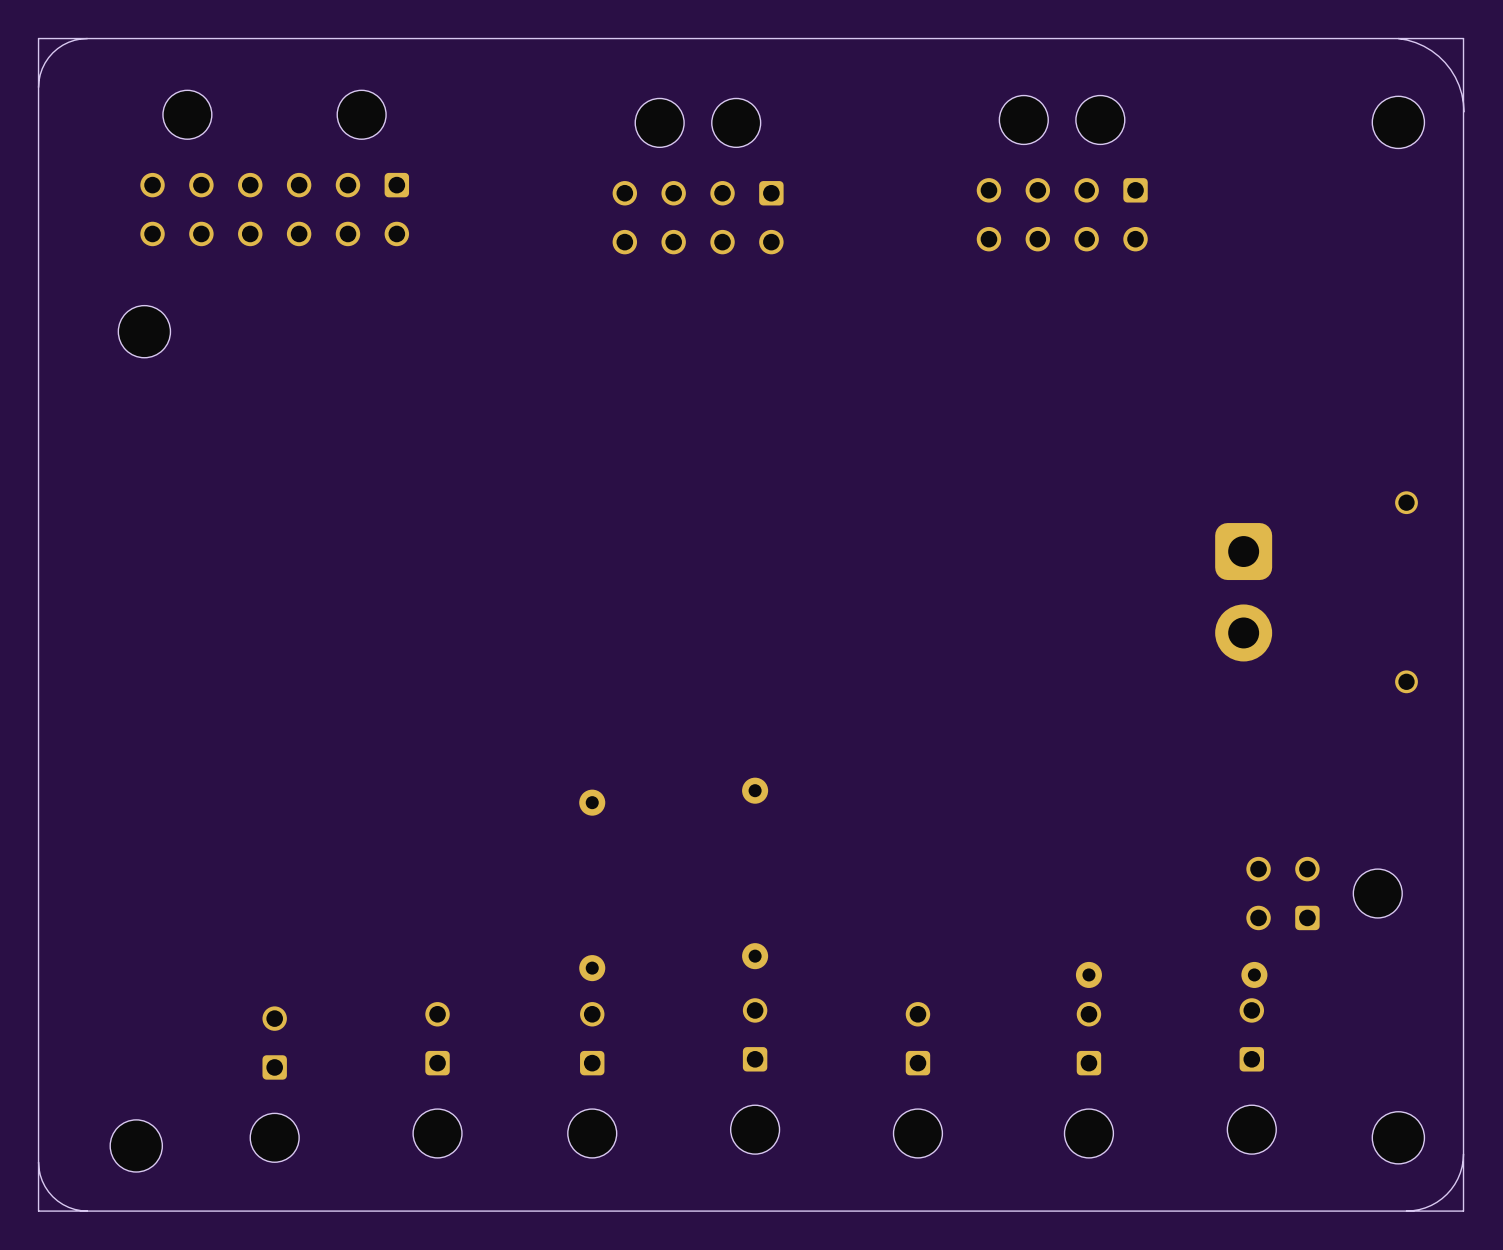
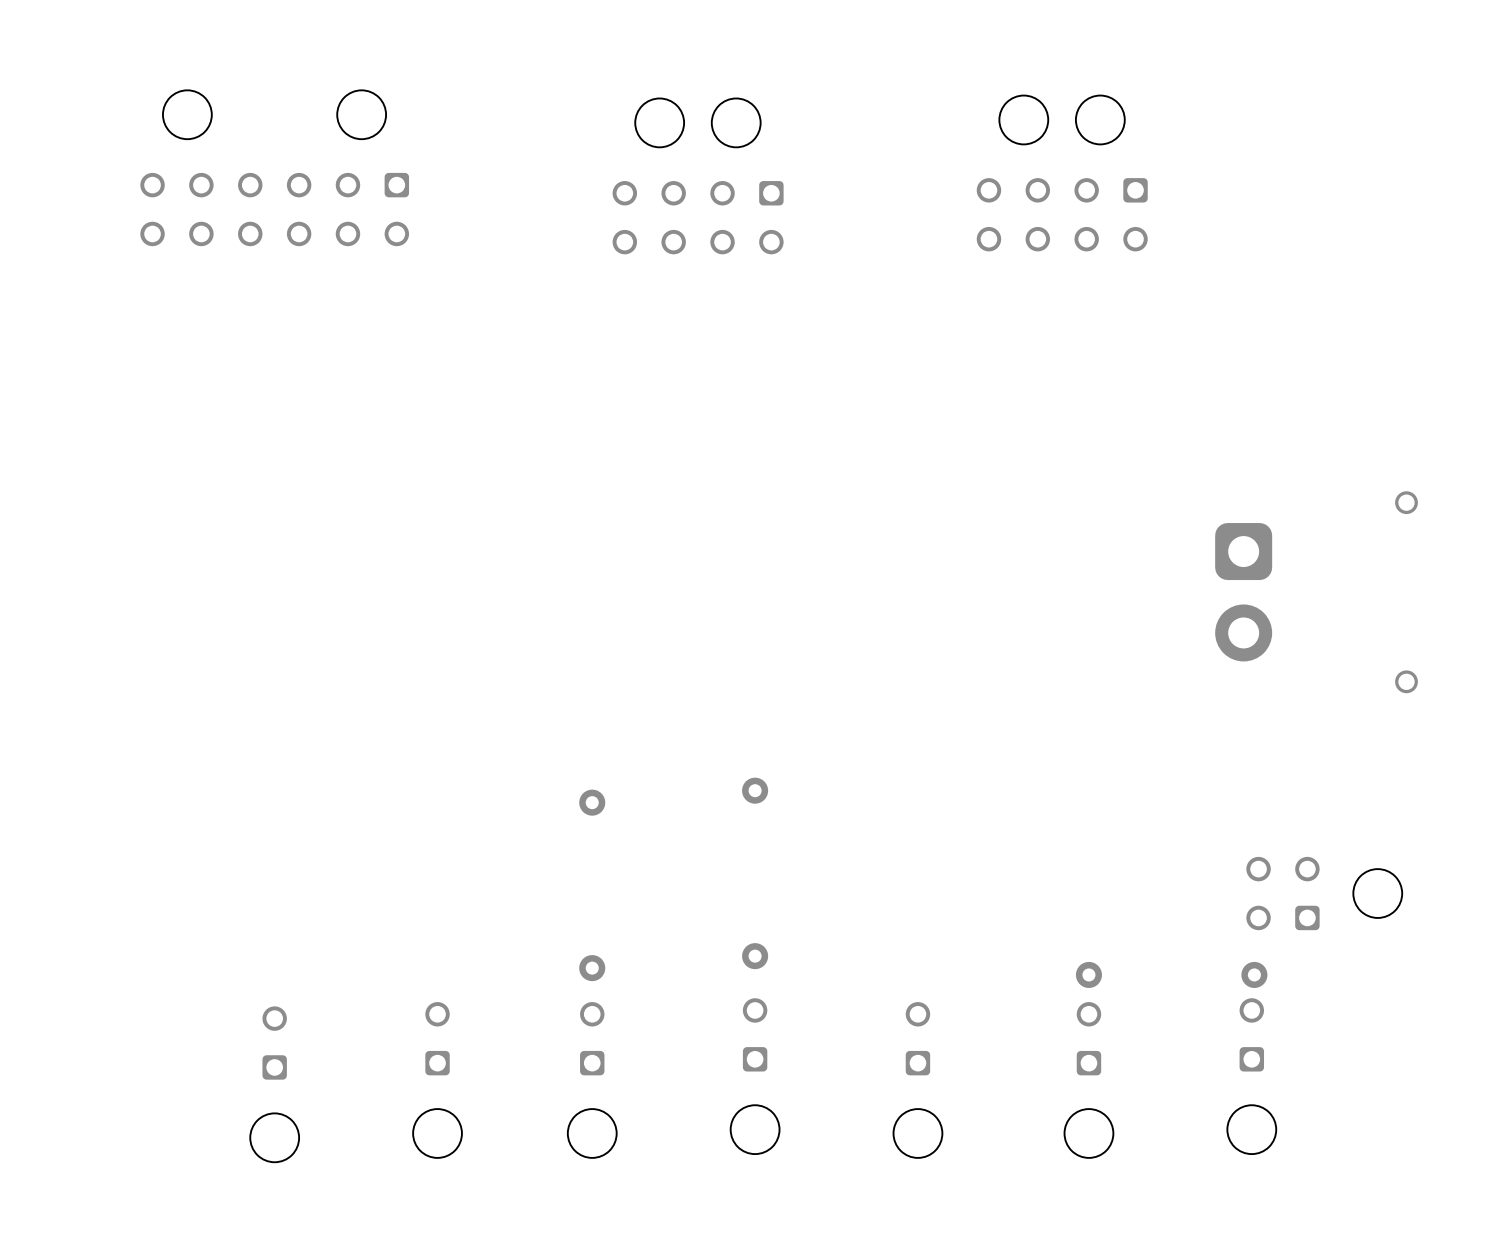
board edge: (87, 38) (68, 42) (52, 52) (42, 68) (38, 87) -> none
board edge: (1398, 38) (1423, 46) (1445, 62) (1459, 85) (1463, 111) -> none
board edge: (1463, 38) (38, 38) (38, 1211) (1463, 1211) (1463, 38) -> none
part: (1398, 122) -> none
part: (144, 331) -> none
part: (1398, 1137) -> none
part: (136, 1145) -> none
board edge: (1463, 1154) (1460, 1172) (1446, 1194) (1425, 1207) (1406, 1211) -> none
board edge: (38, 1162) (42, 1180) (52, 1196) (68, 1207) (87, 1211) -> none

